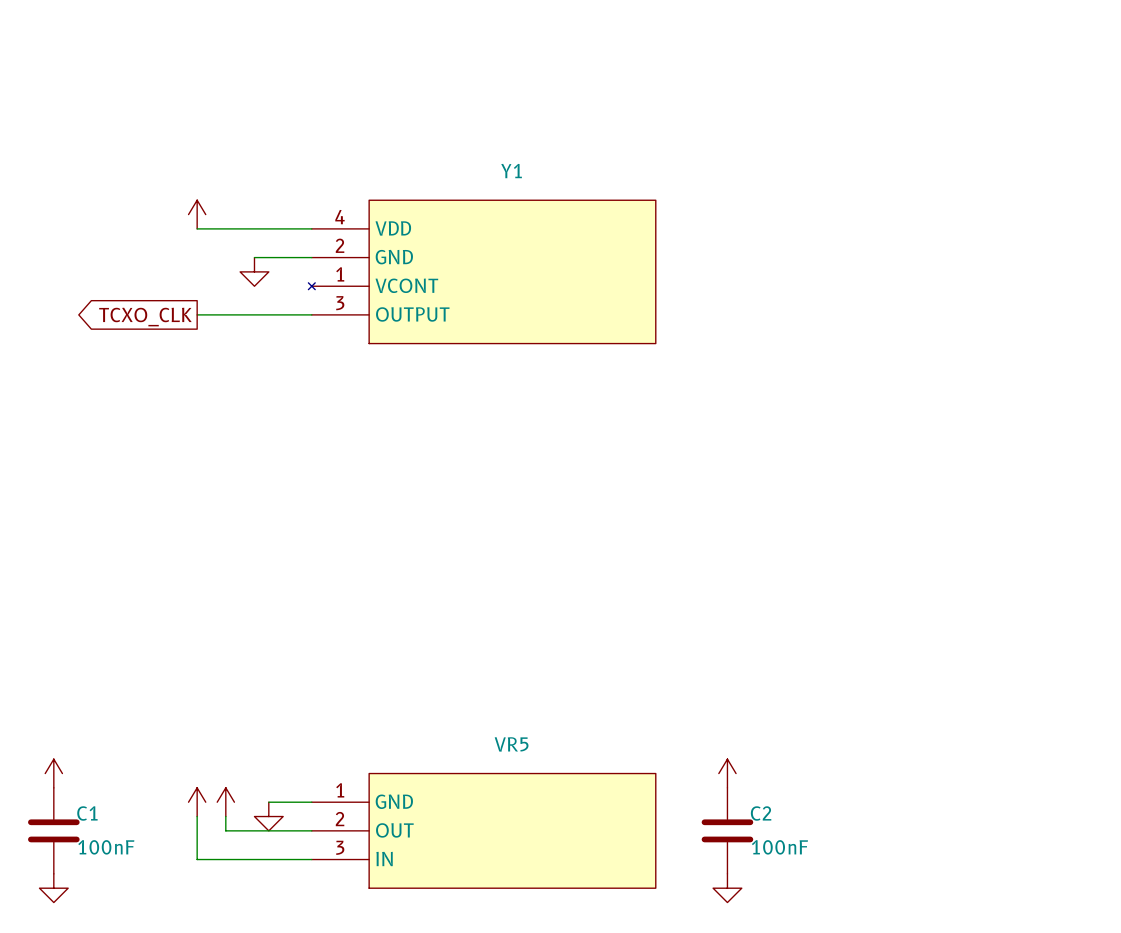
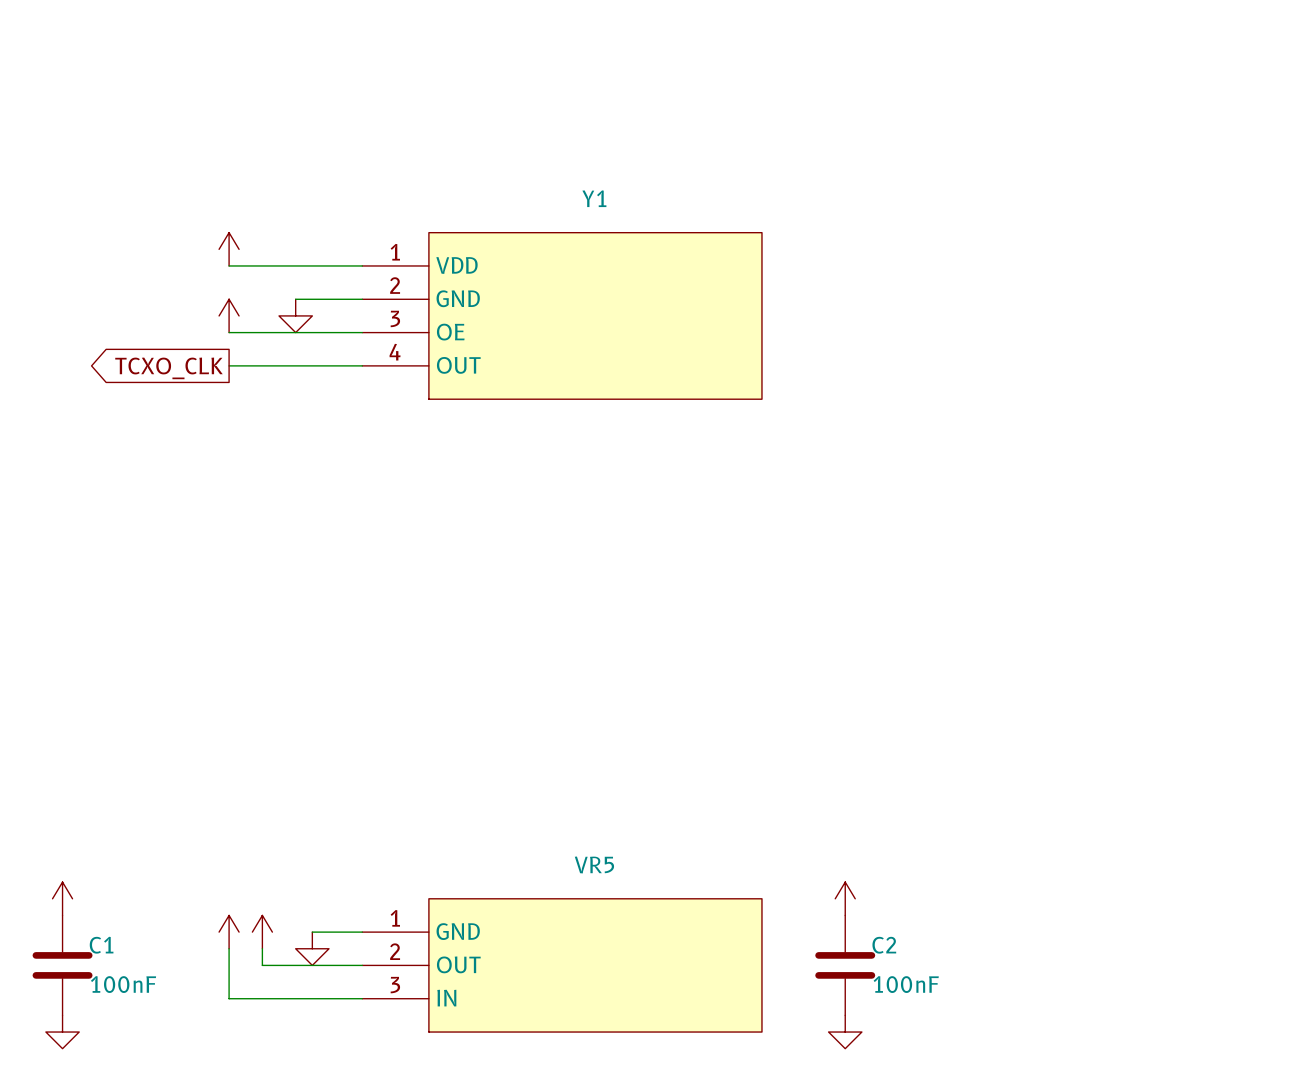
Y1 symbol: [308, 200, 656, 344] -> [362, 232, 762, 400]
power symbol: none -> (229, 315)
wire: none -> (229, 332) (362, 332)

